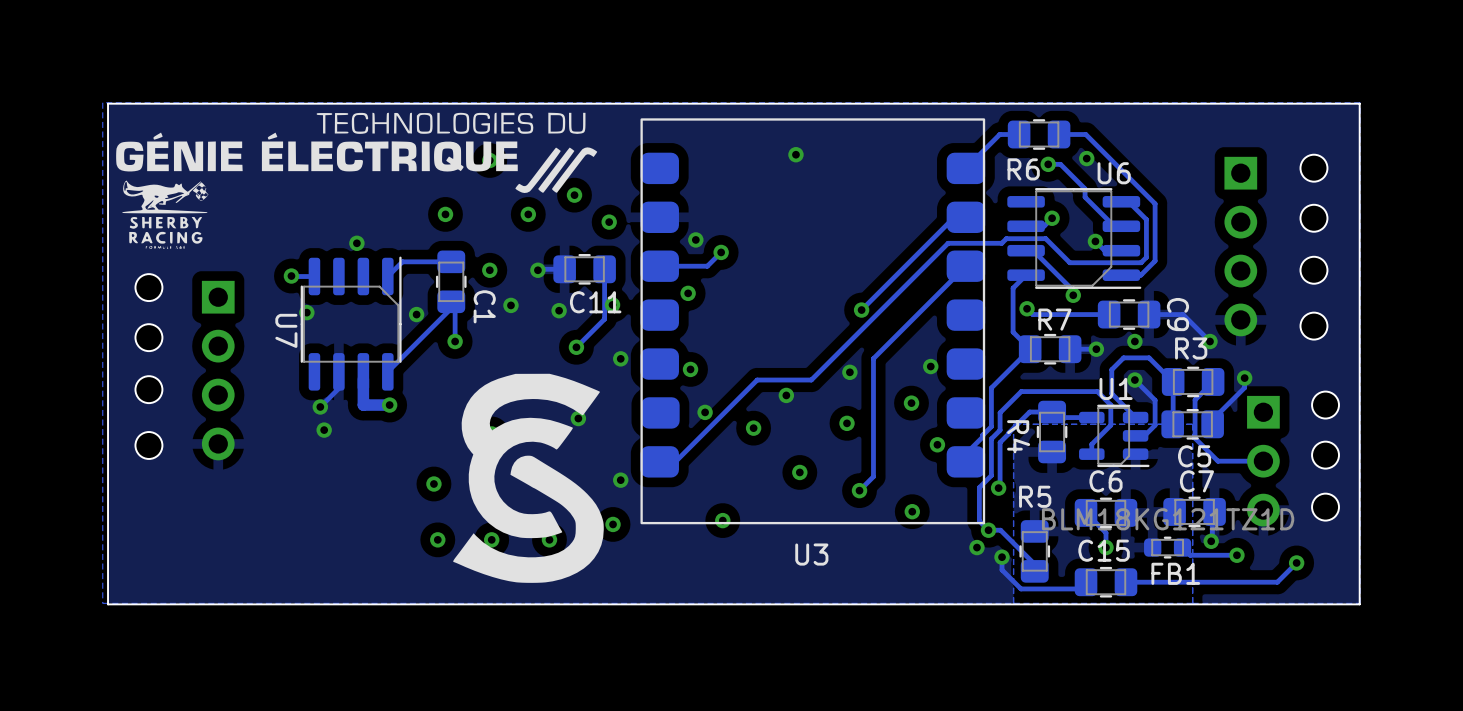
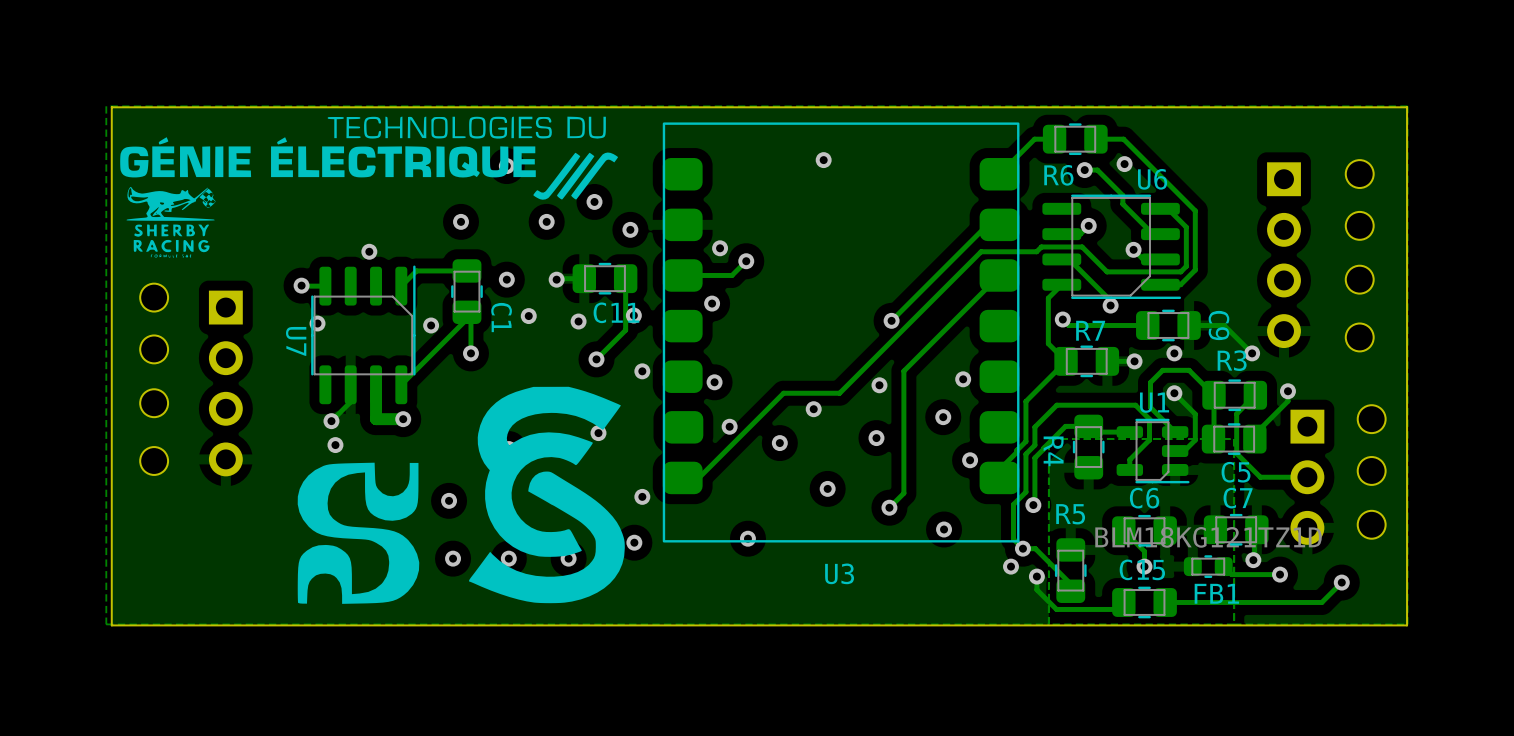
drawing: none -> [297, 462, 420, 604]

